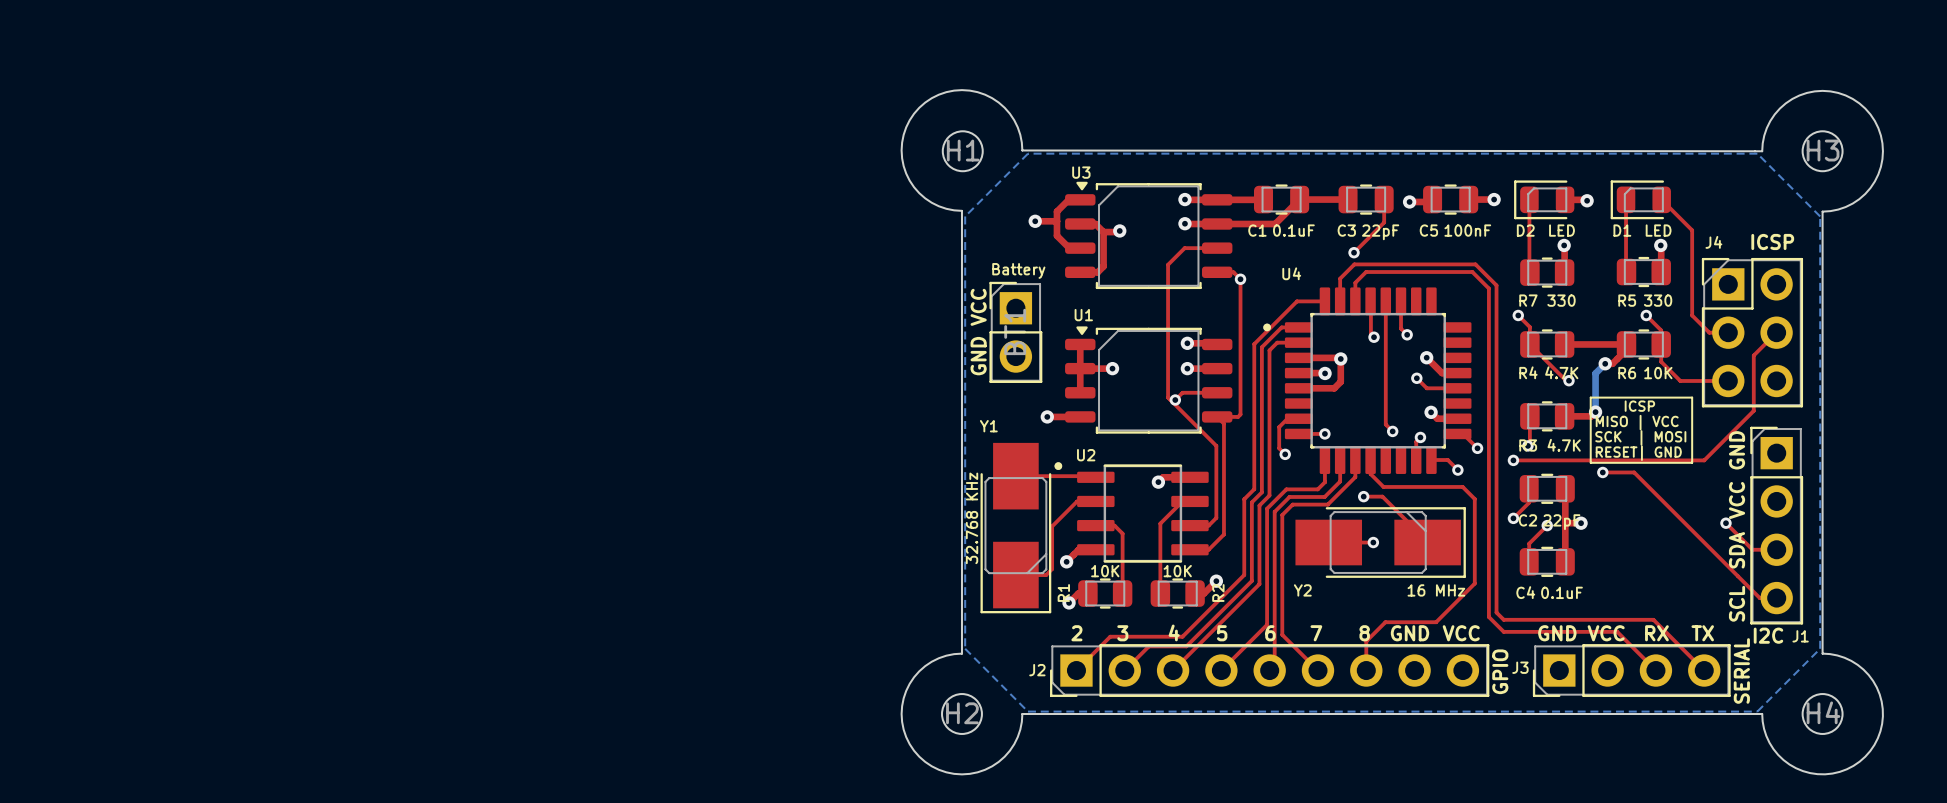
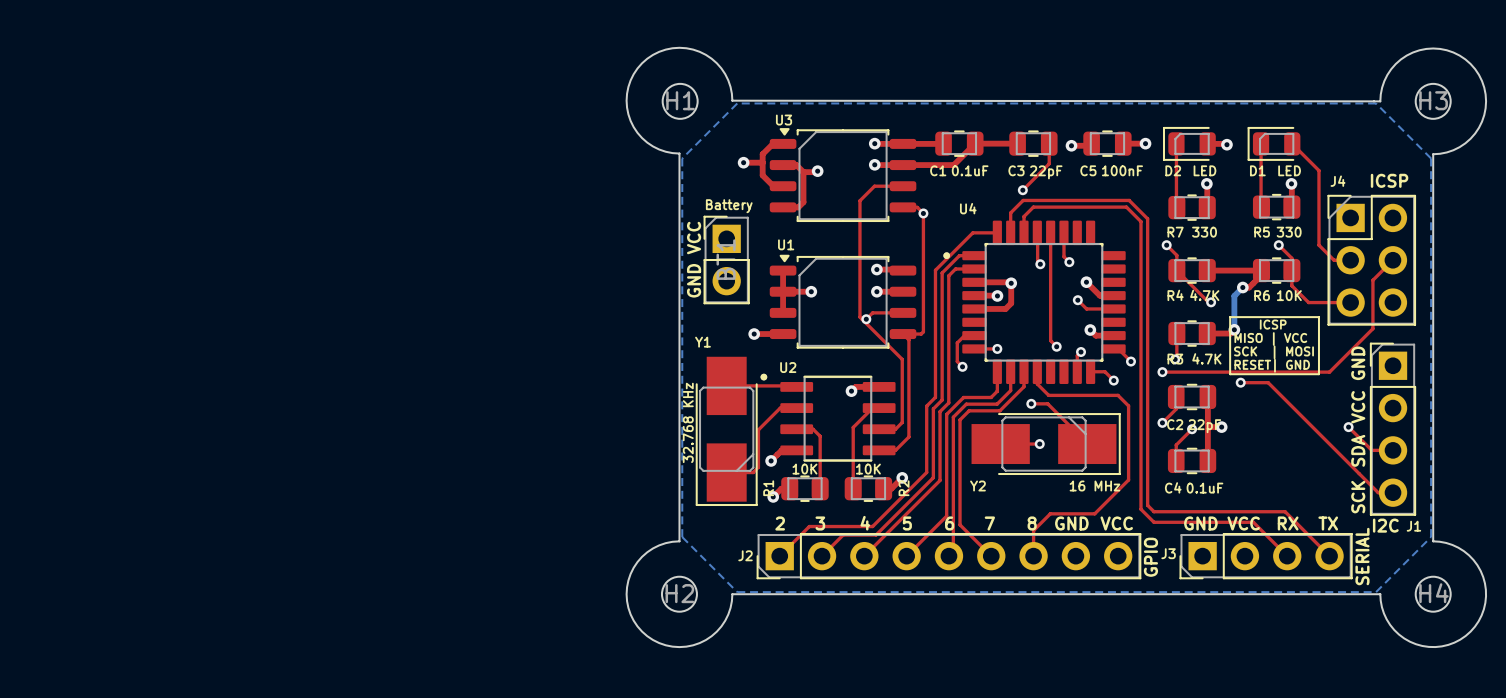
text: SCL (1737, 603) -> SCK (1358, 497)

